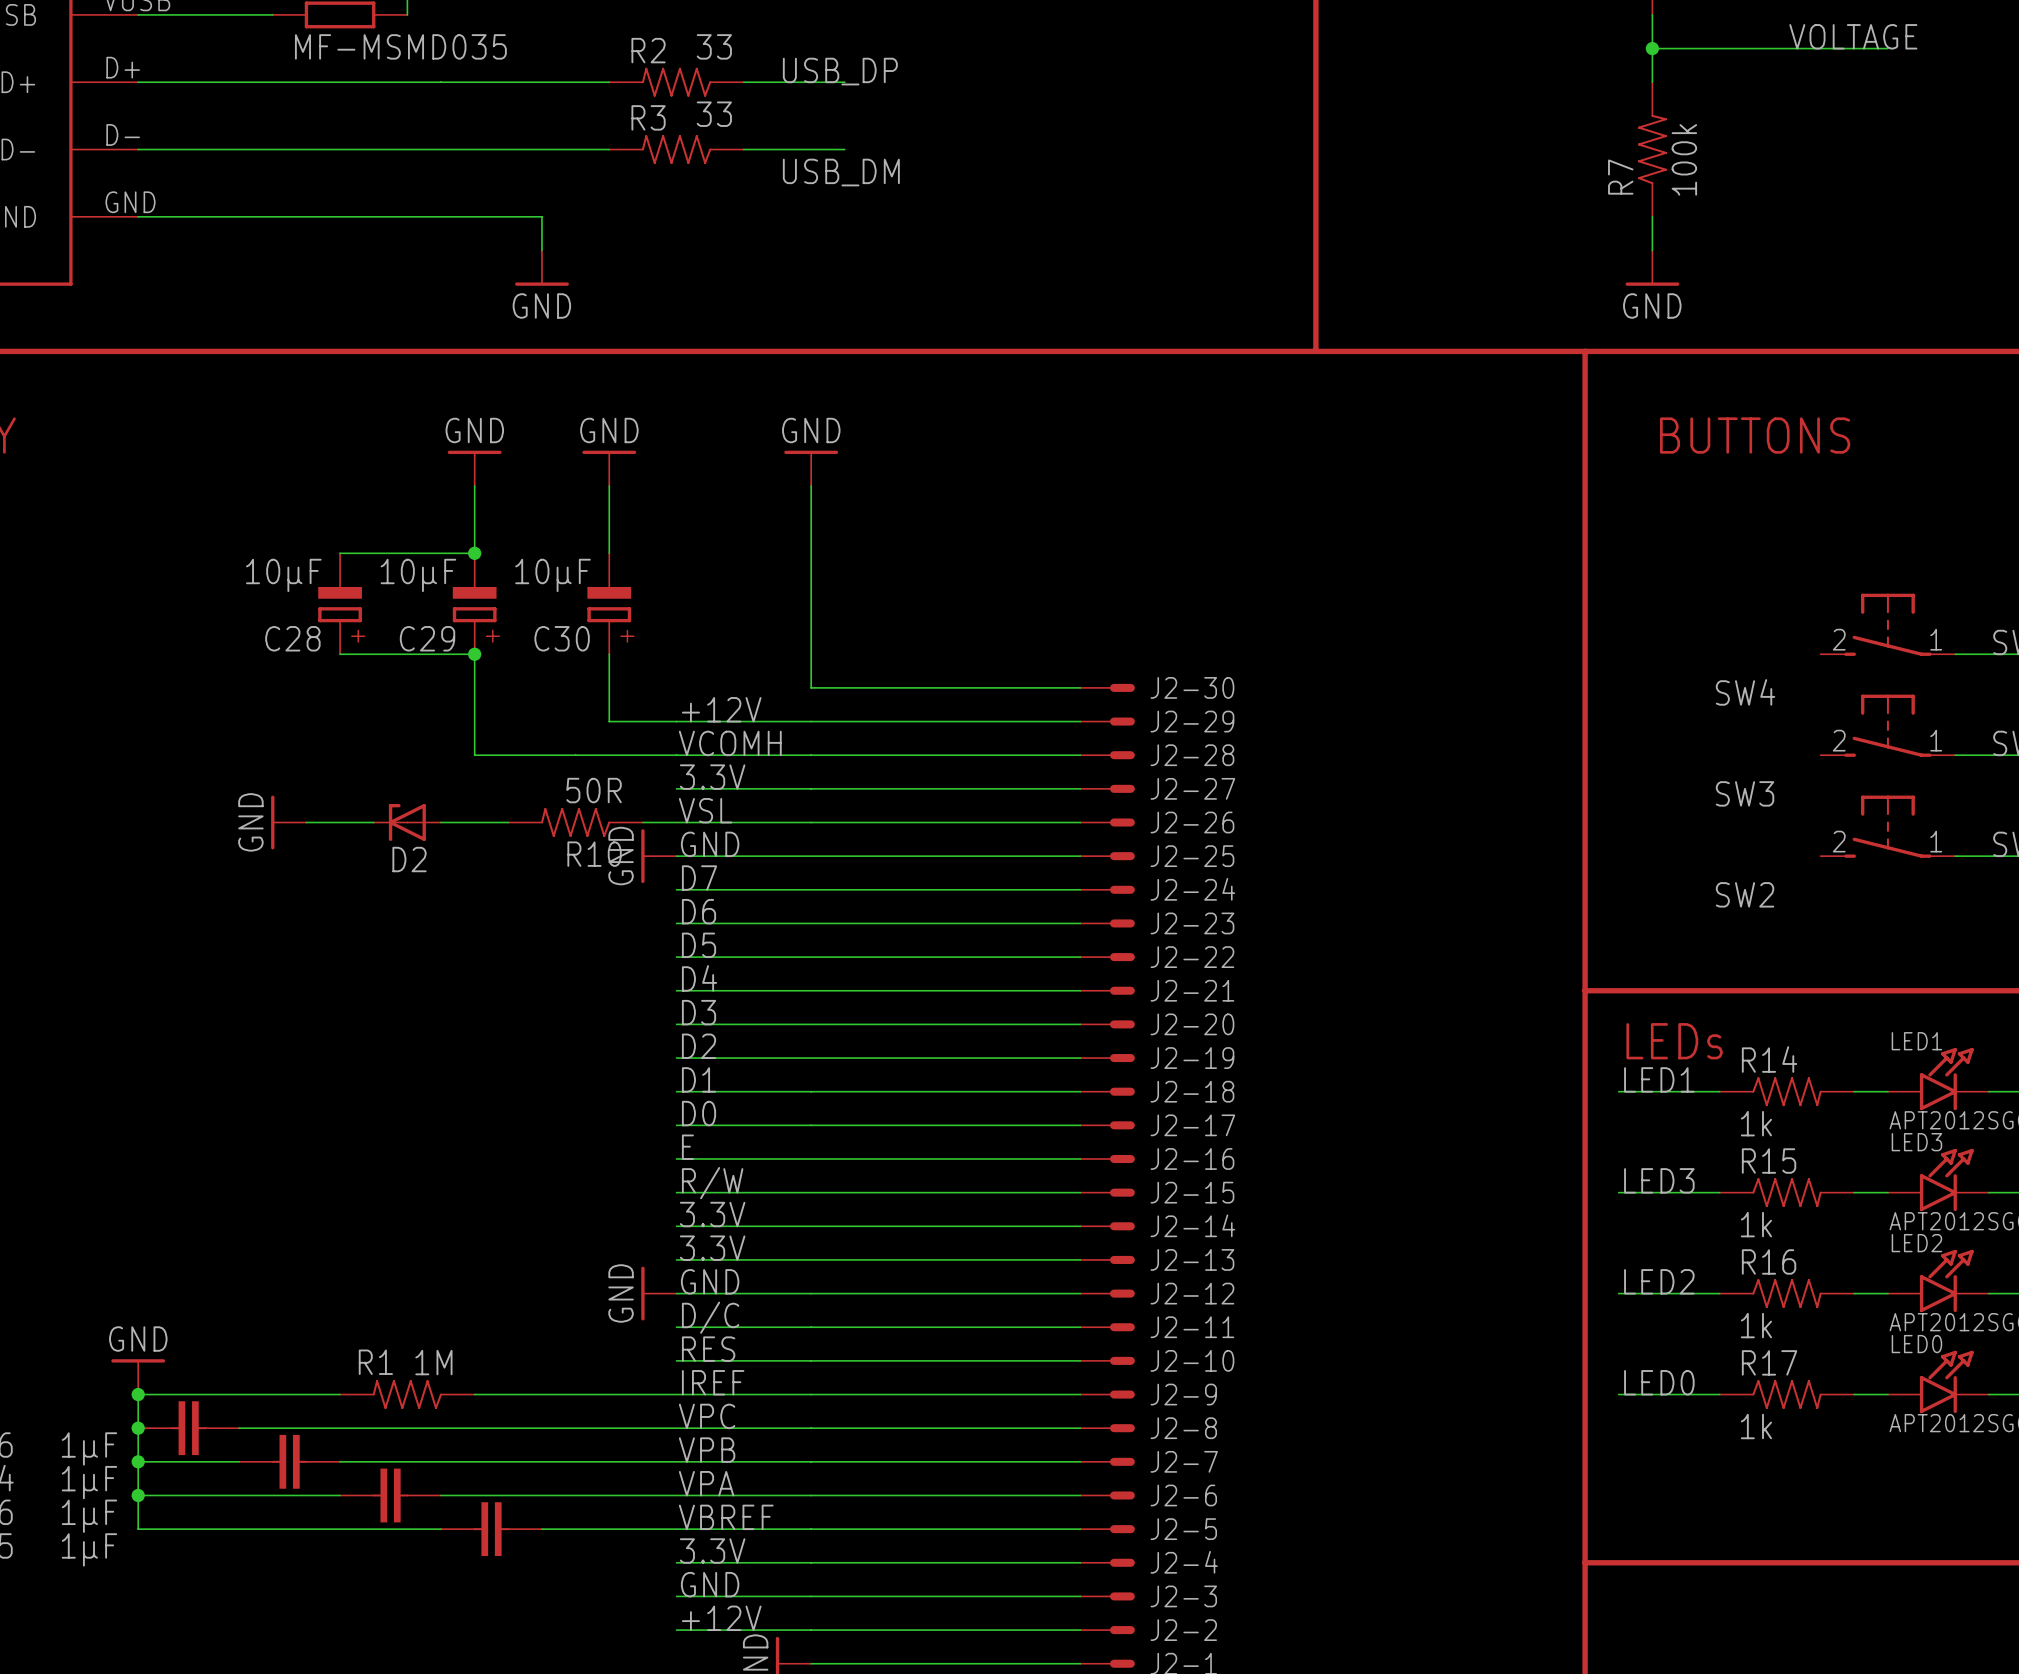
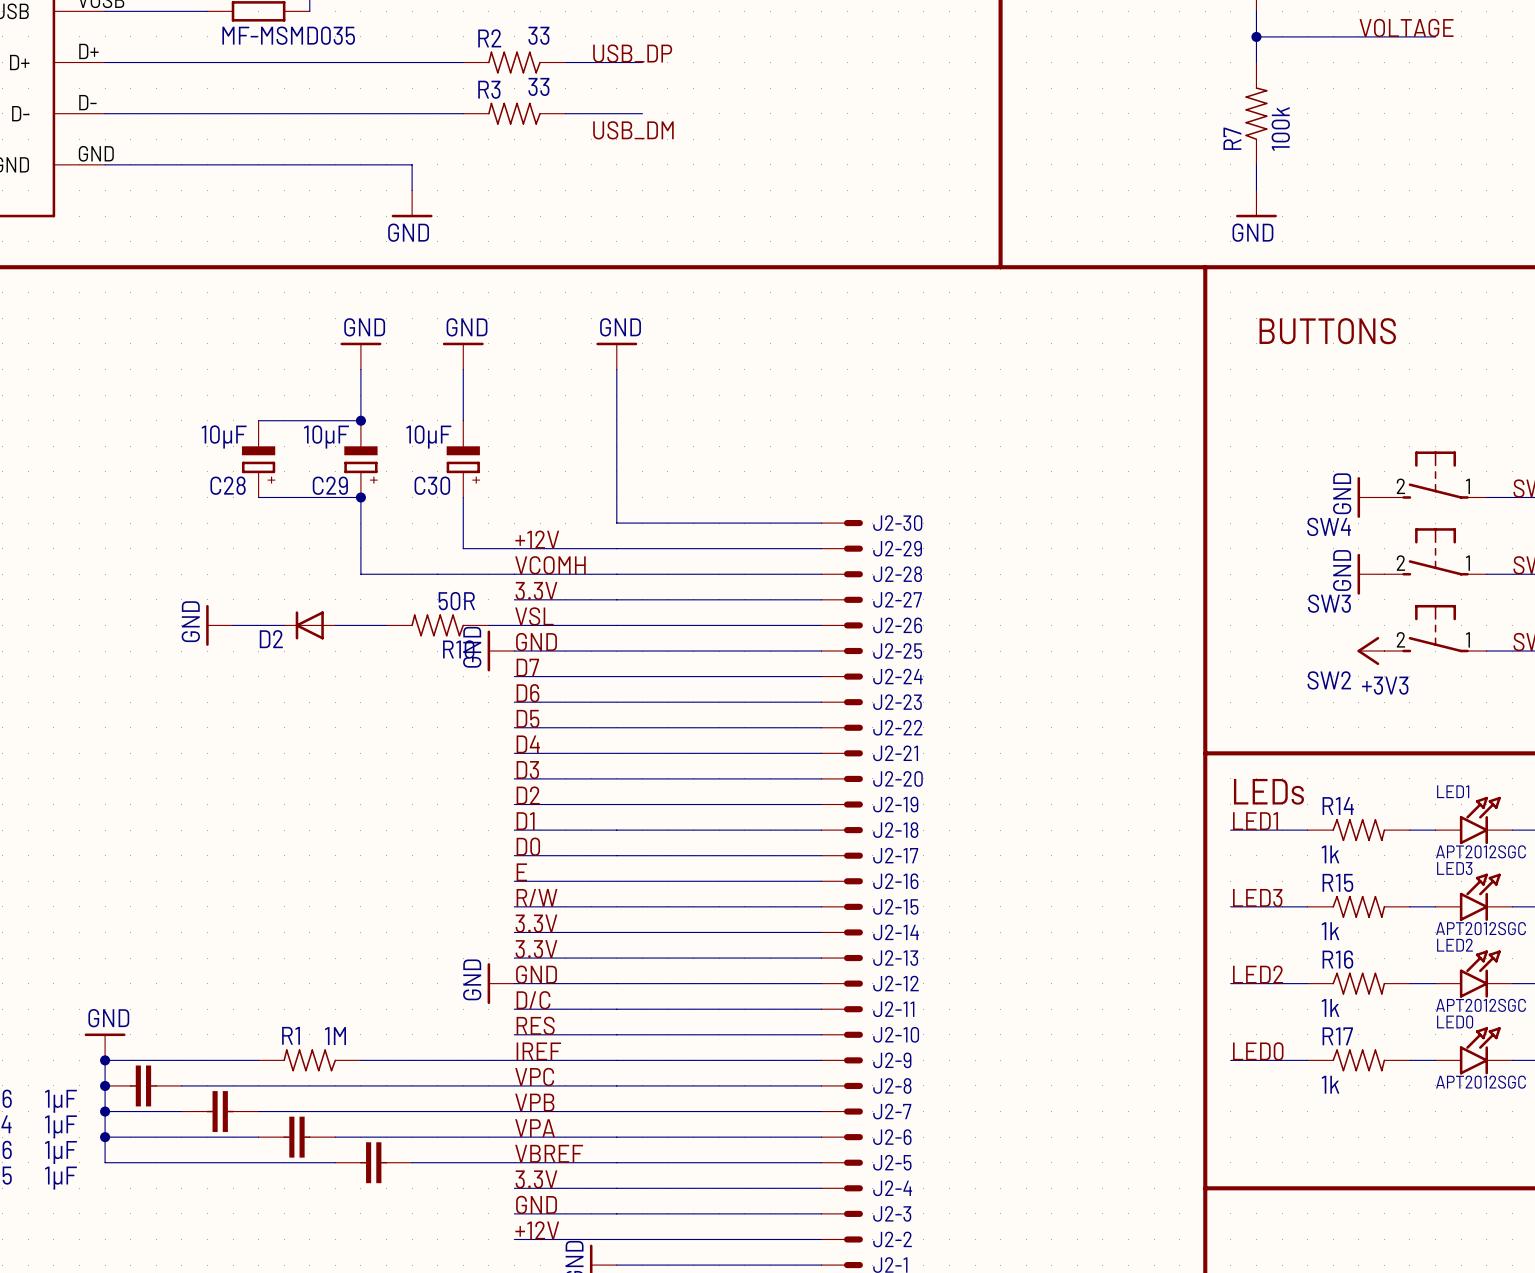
power symbol: none -> GND (1370, 497)
power symbol: none -> GND (1370, 574)
D2 symbol: [373, 804, 442, 842] -> [284, 611, 336, 640]
power symbol: none -> +3V3 (1370, 651)
D2 name position: D2 (409, 859) -> D2 (271, 639)

